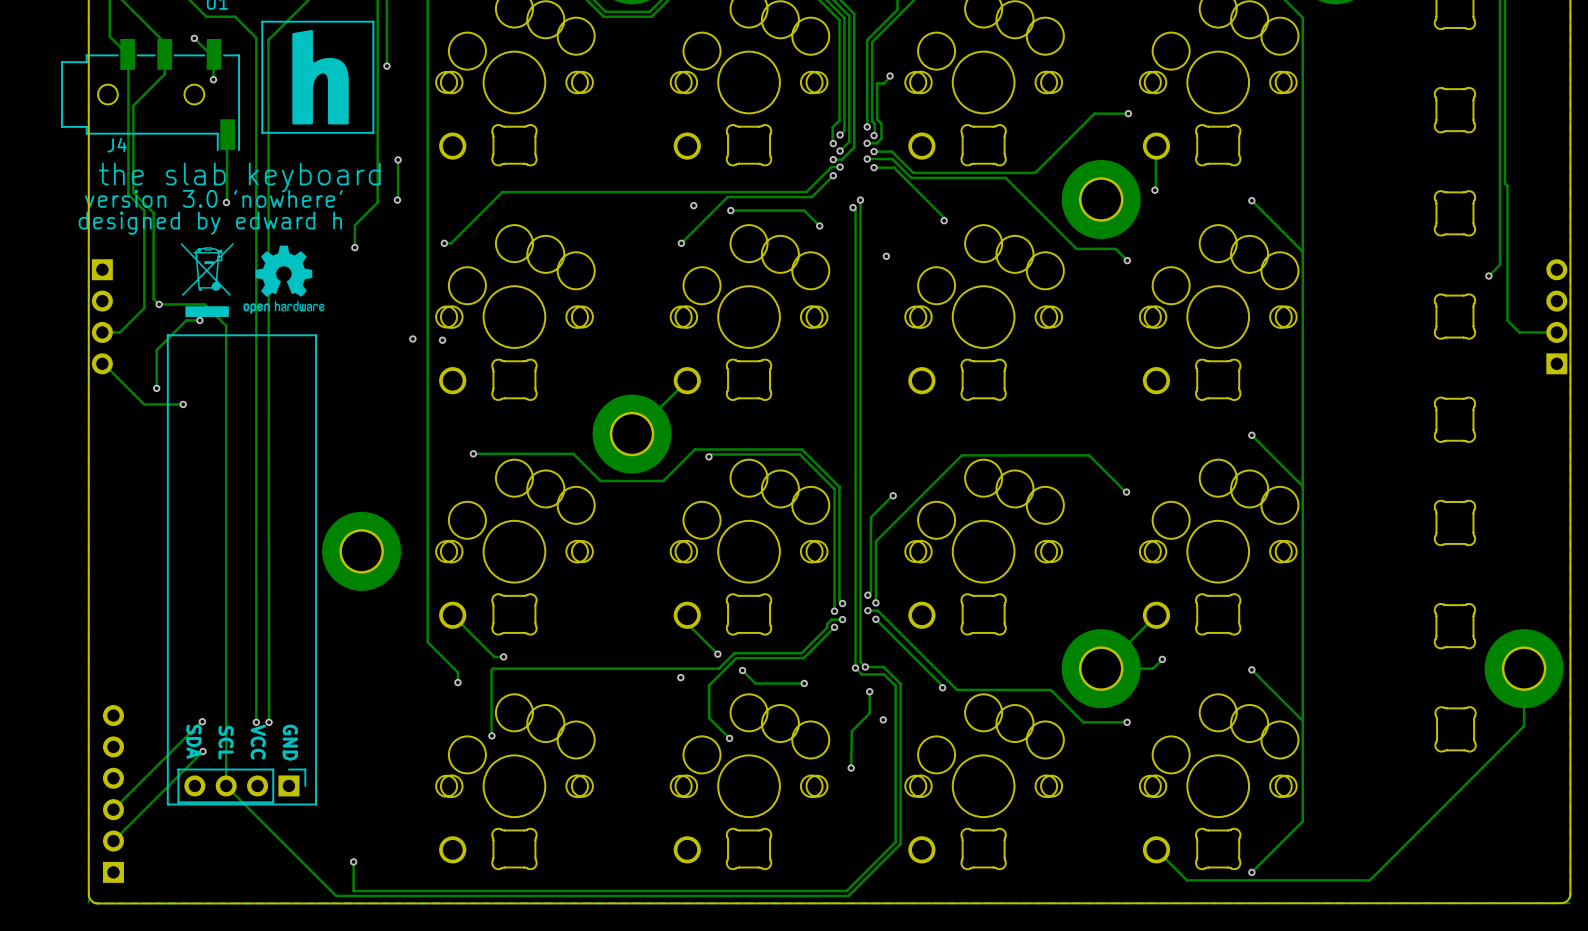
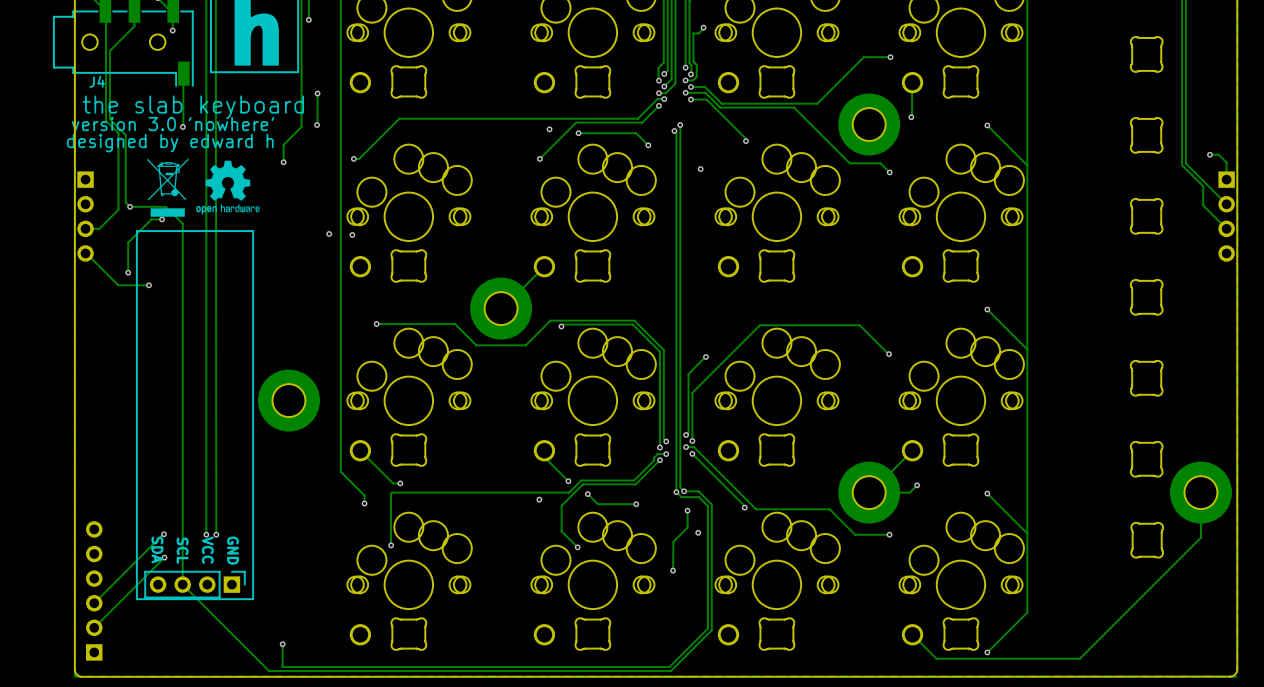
track: (1504, 183) (1507, 185) (1507, 320) (1519, 332) (1556, 332) -> (1185, 111) (1185, 163) (1226, 204)
track: none -> (1209, 154) (1218, 154) (1226, 162) (1226, 179)
track: (1500, 251) (1500, 264) (1488, 276) -> (1182, 165) (1203, 186) (1203, 205) (1226, 228)
via position: (1488, 276) -> (1209, 154)
part rotation: 0° (1556, 316) -> 180° (1226, 216)

